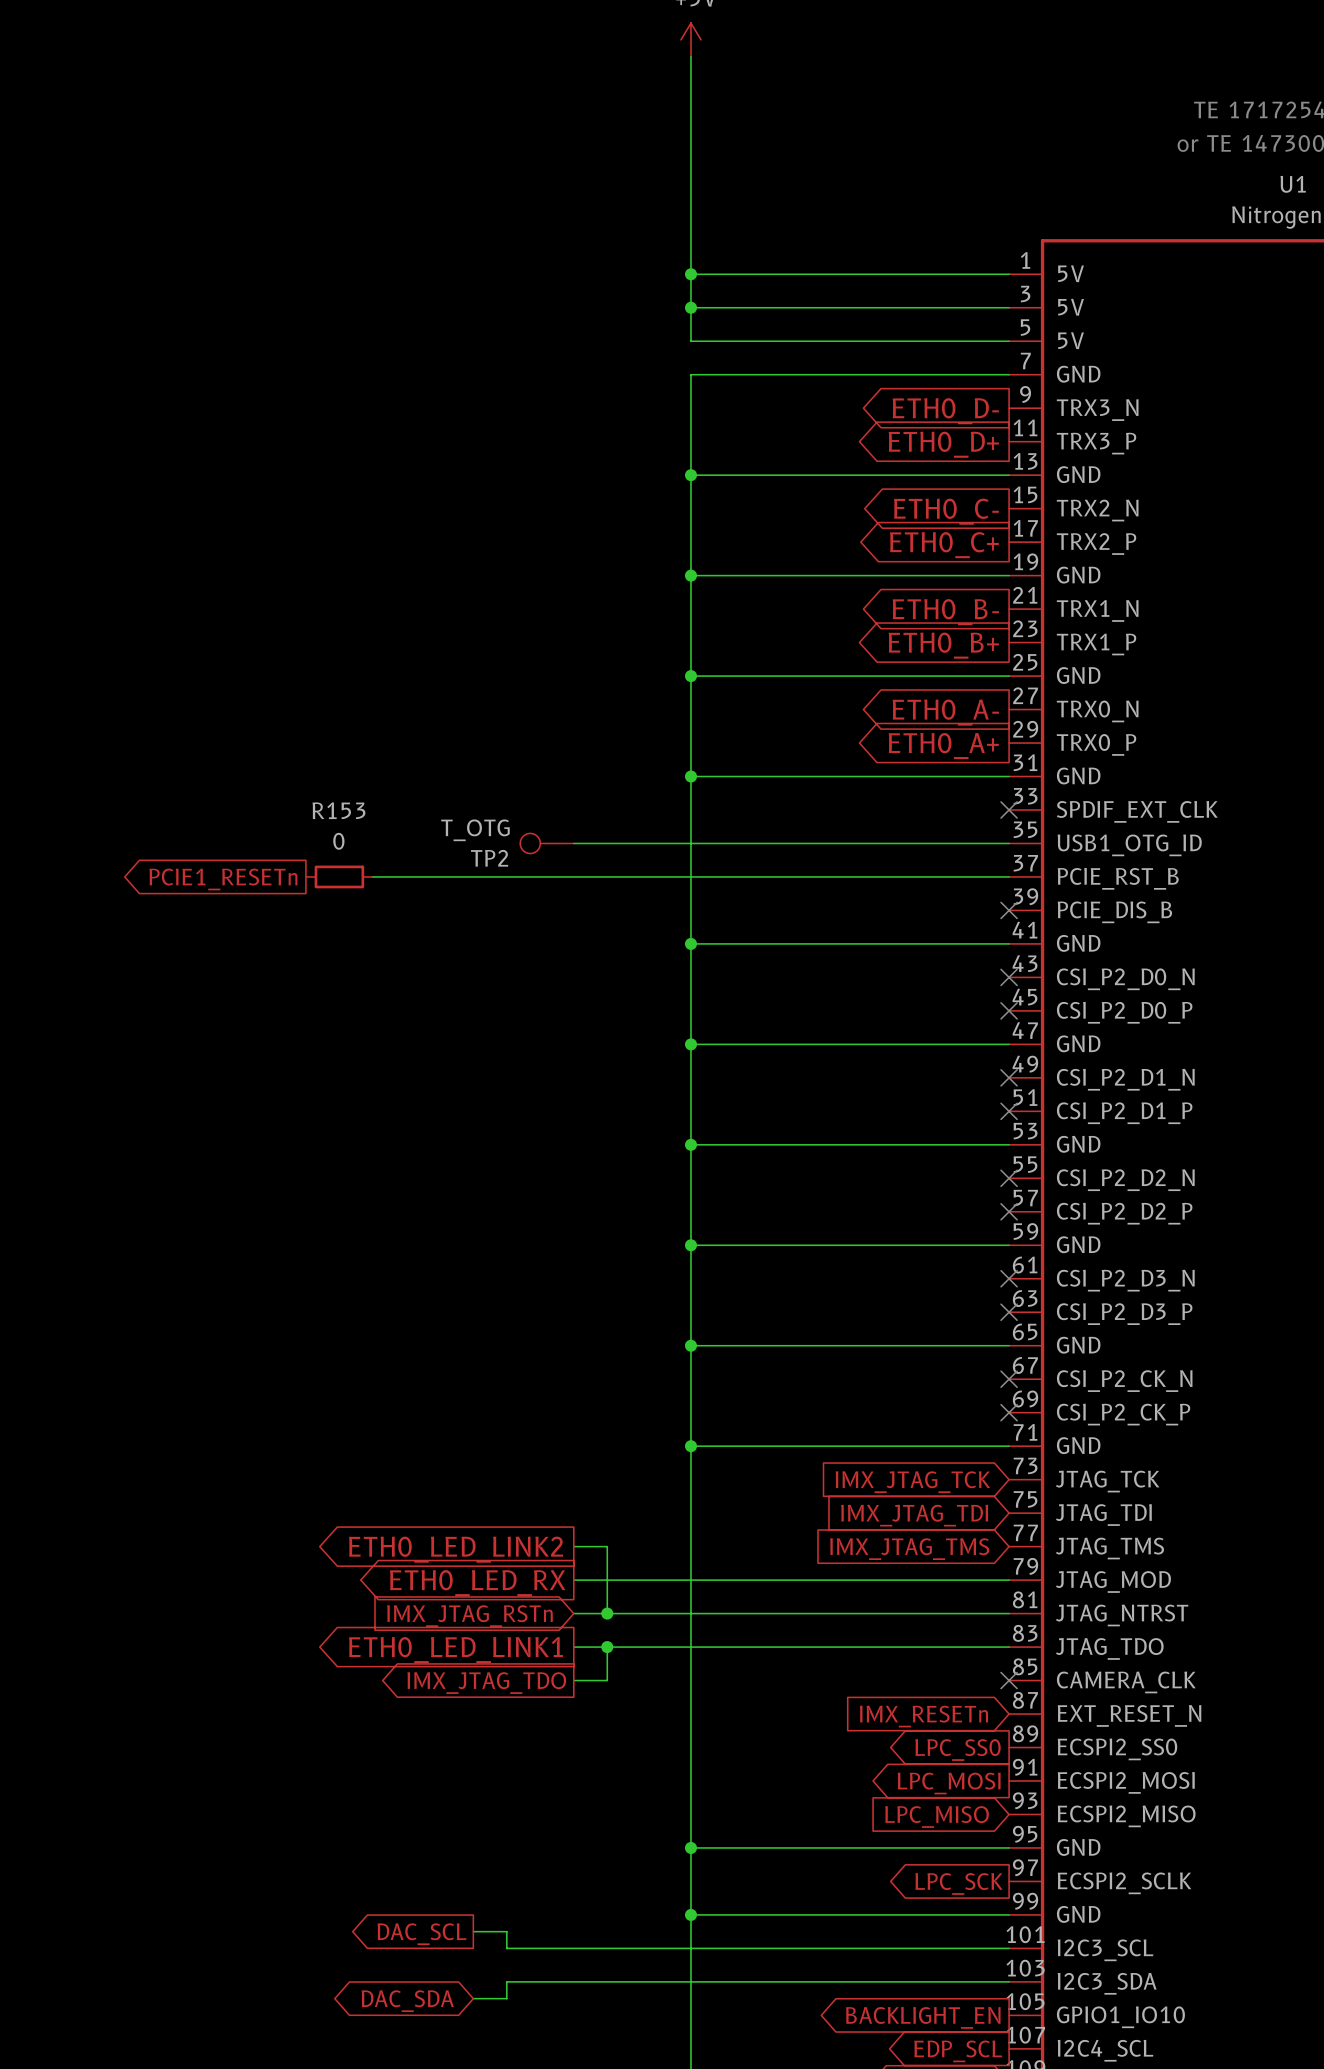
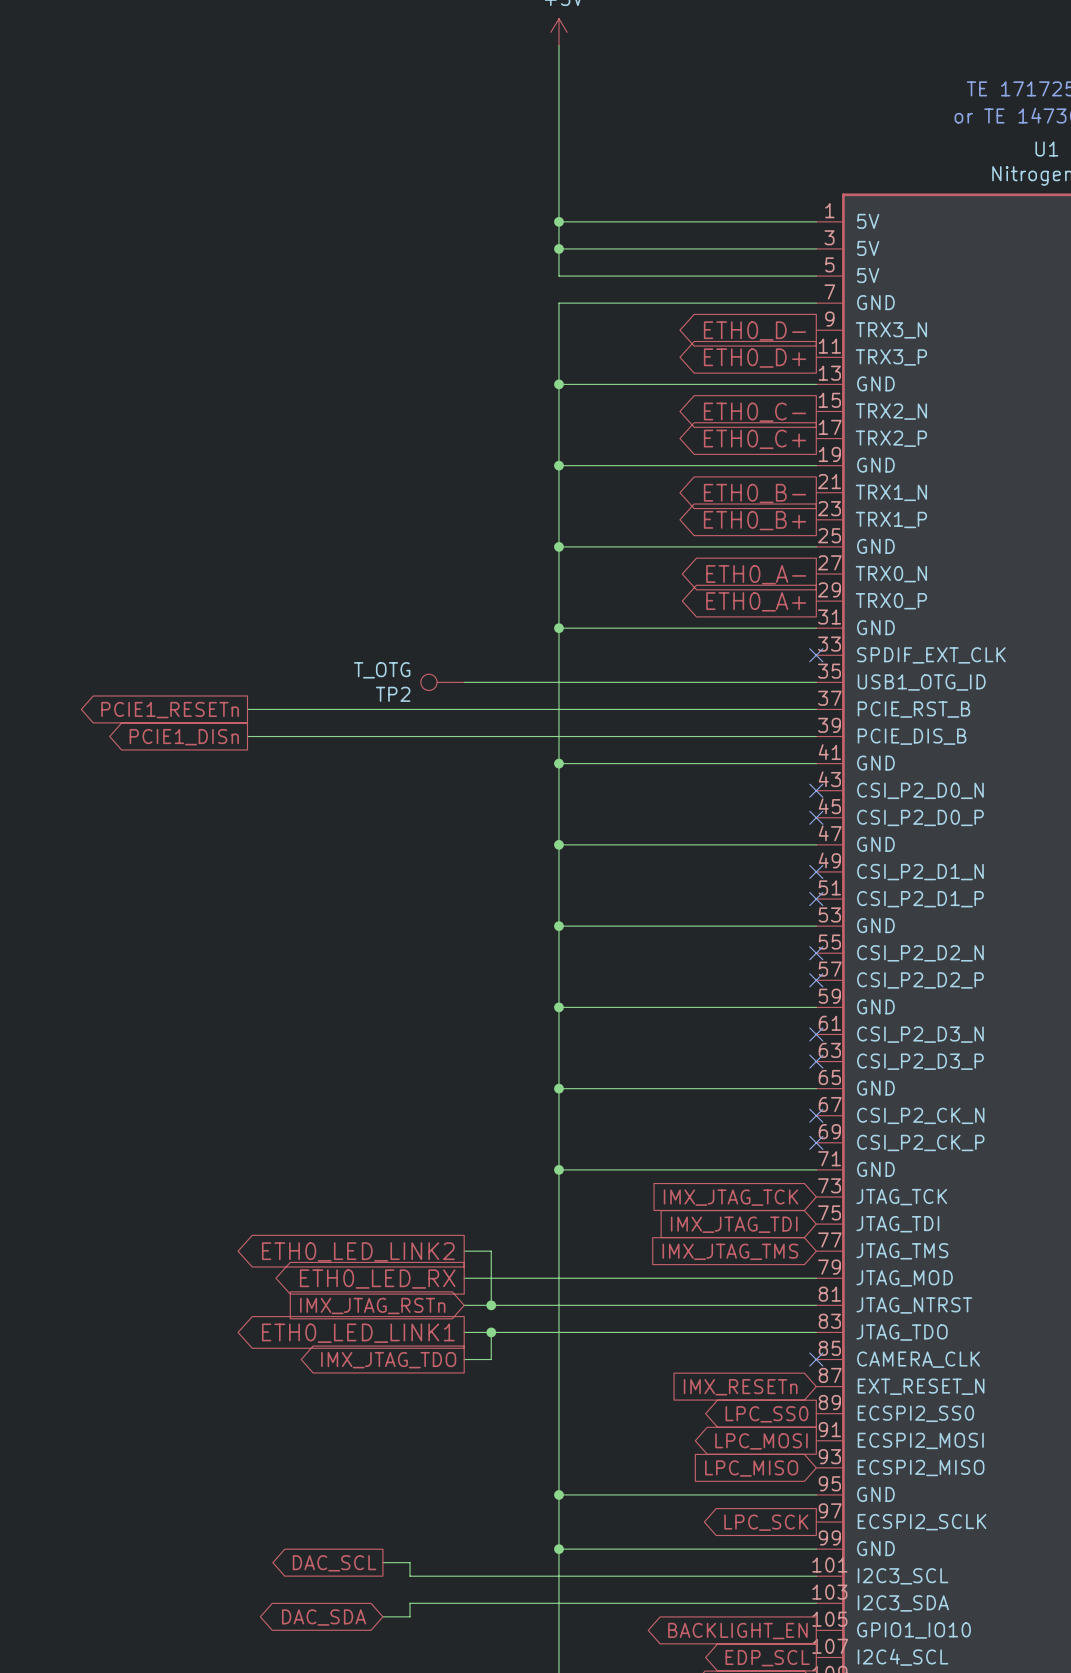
wire: none -> (247, 709) (301, 709)
R153: 0 (339, 876) -> none
wire: none -> (247, 736) (816, 736)
no-connect mark: (1009, 910) -> none
global label: none -> PCIE1_DISn (184, 737)

